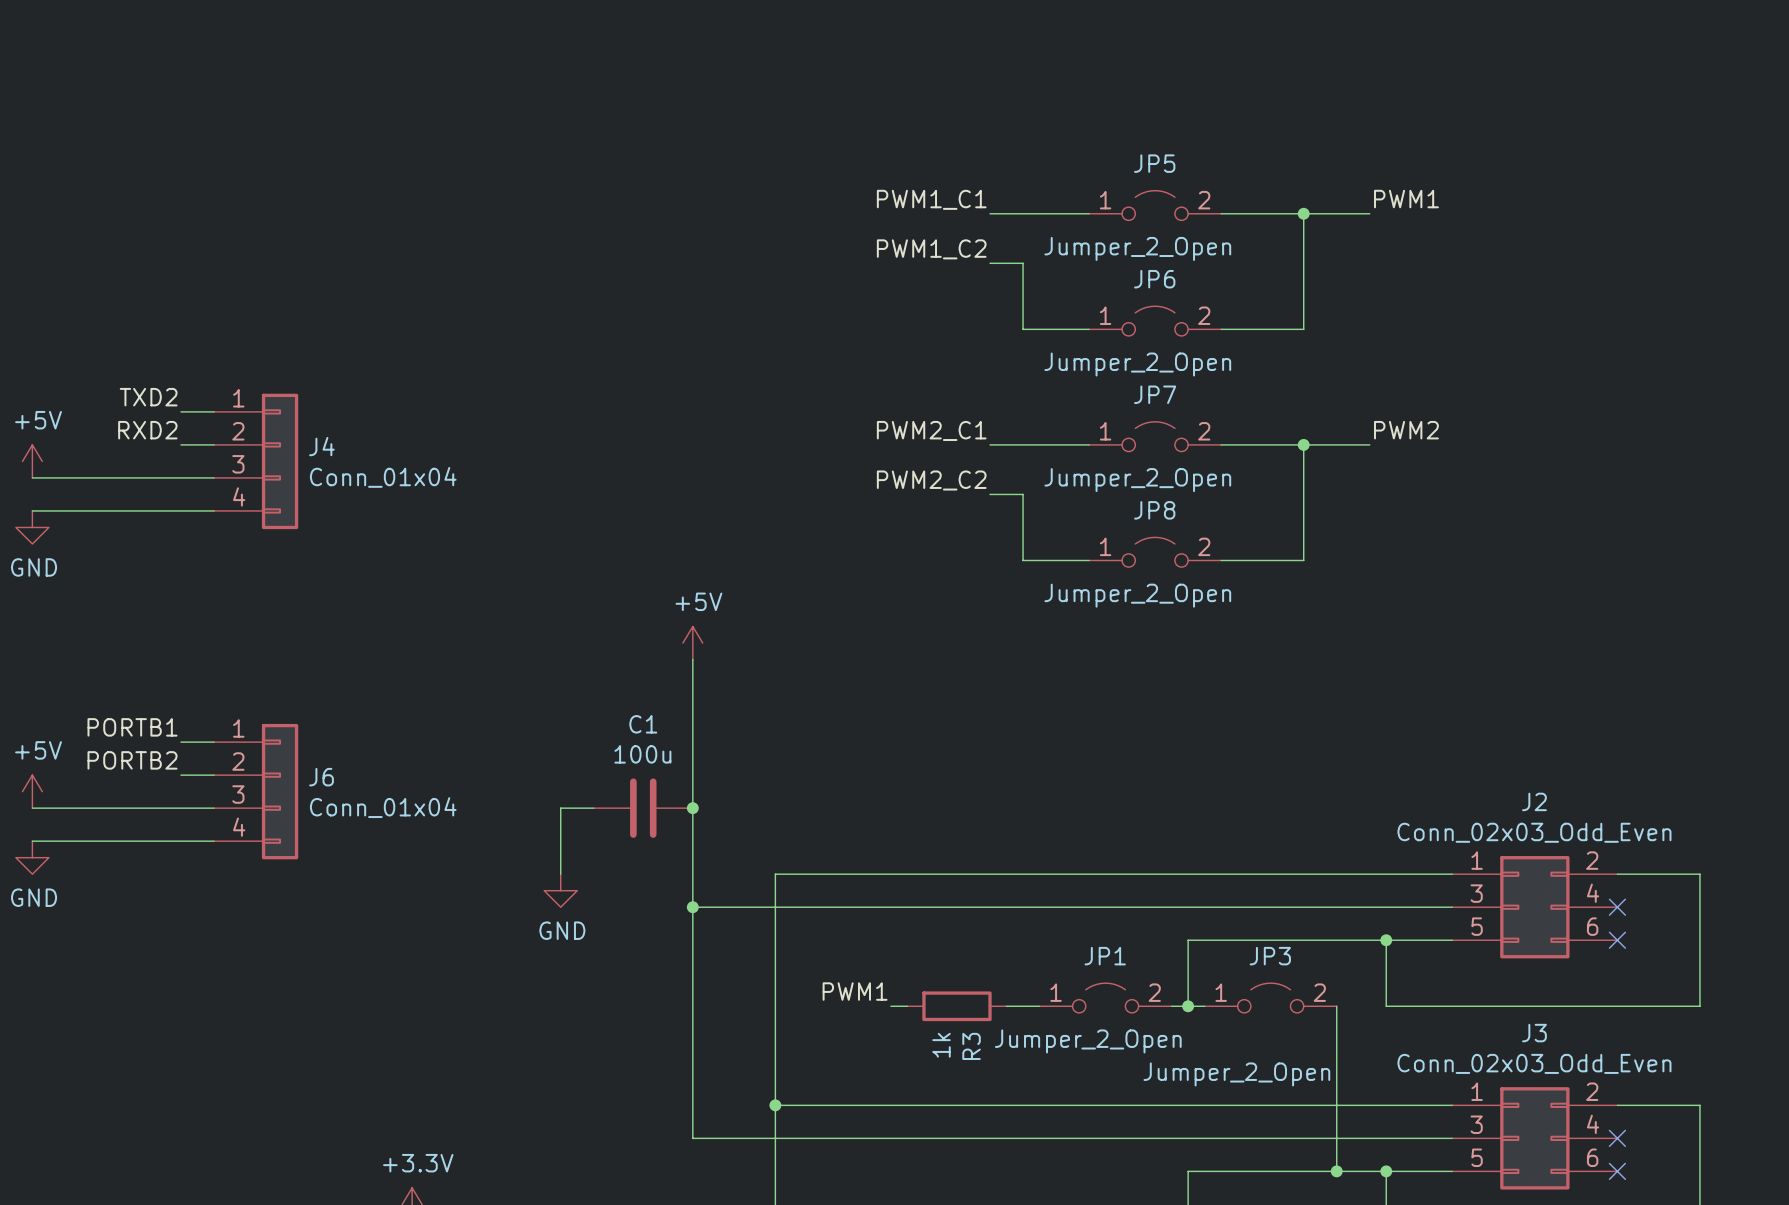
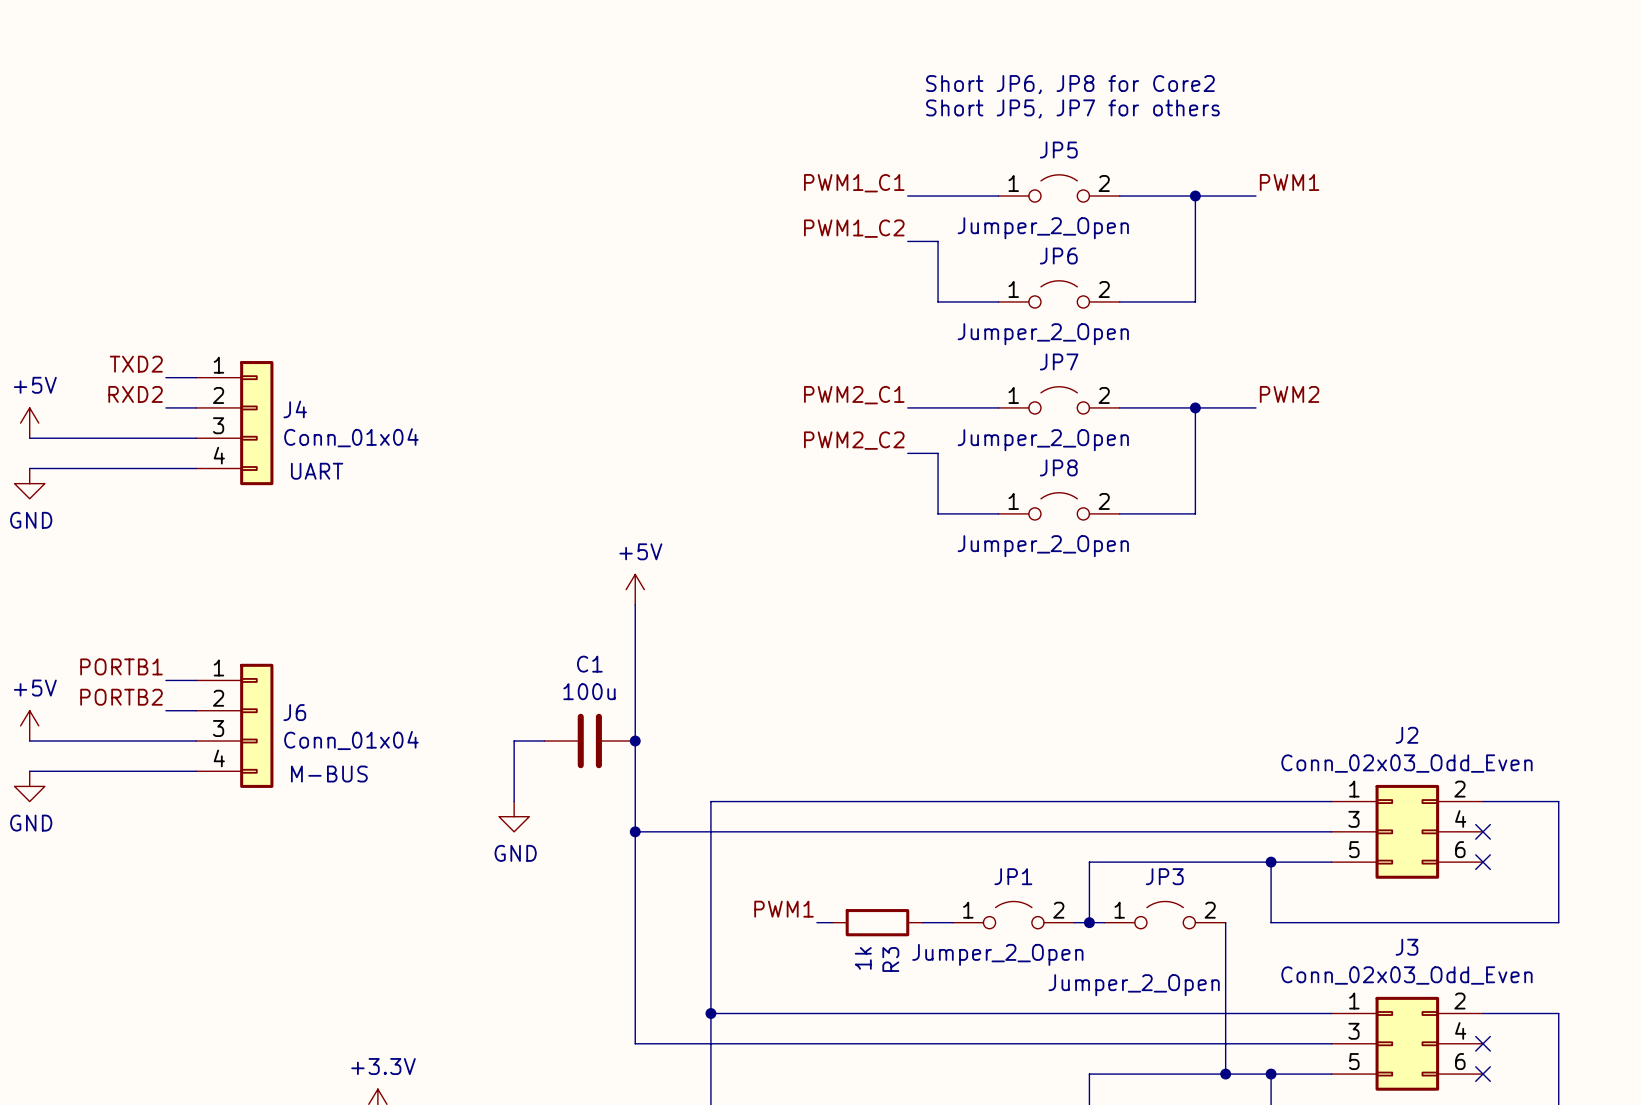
text: none -> Short JP6, JP8 for Core2 (1070, 84)
text: none -> Short JP5, JP7 for others (1072, 108)
text: none -> UART (317, 471)
text: none -> M-BUS (329, 774)

